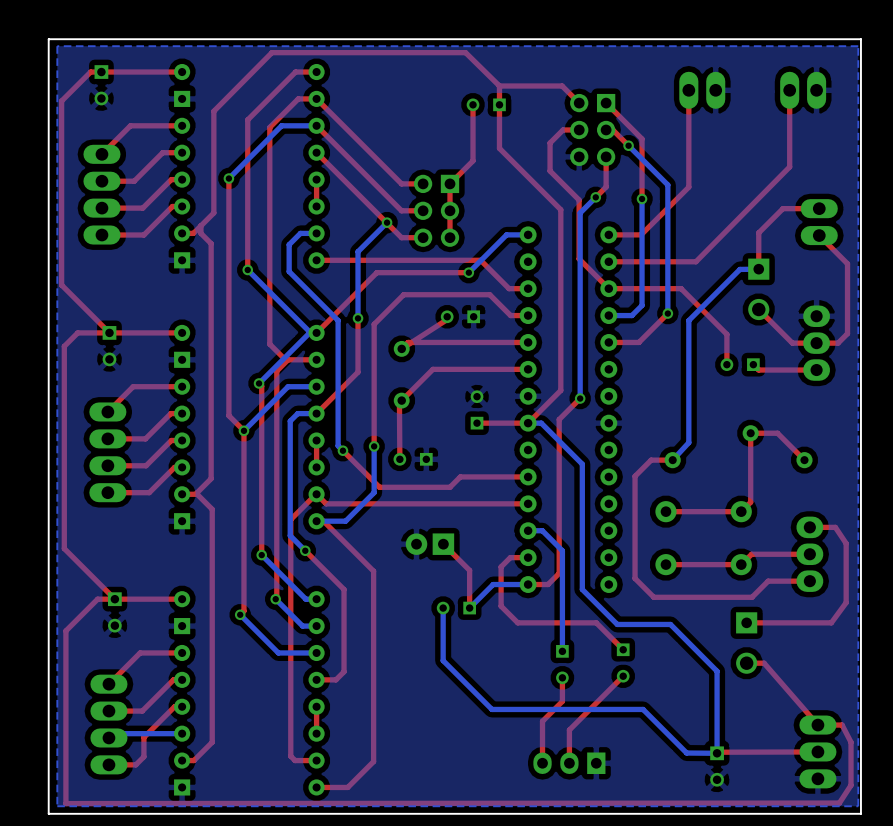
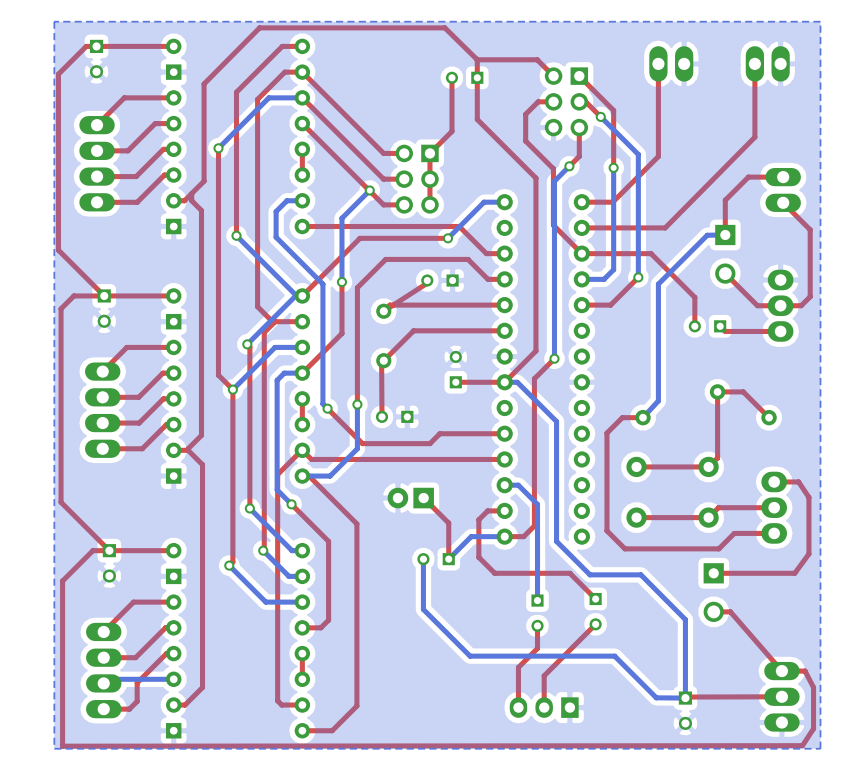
board edge: (860, 39) (48, 39) (48, 813) (860, 813) (860, 39) -> none

